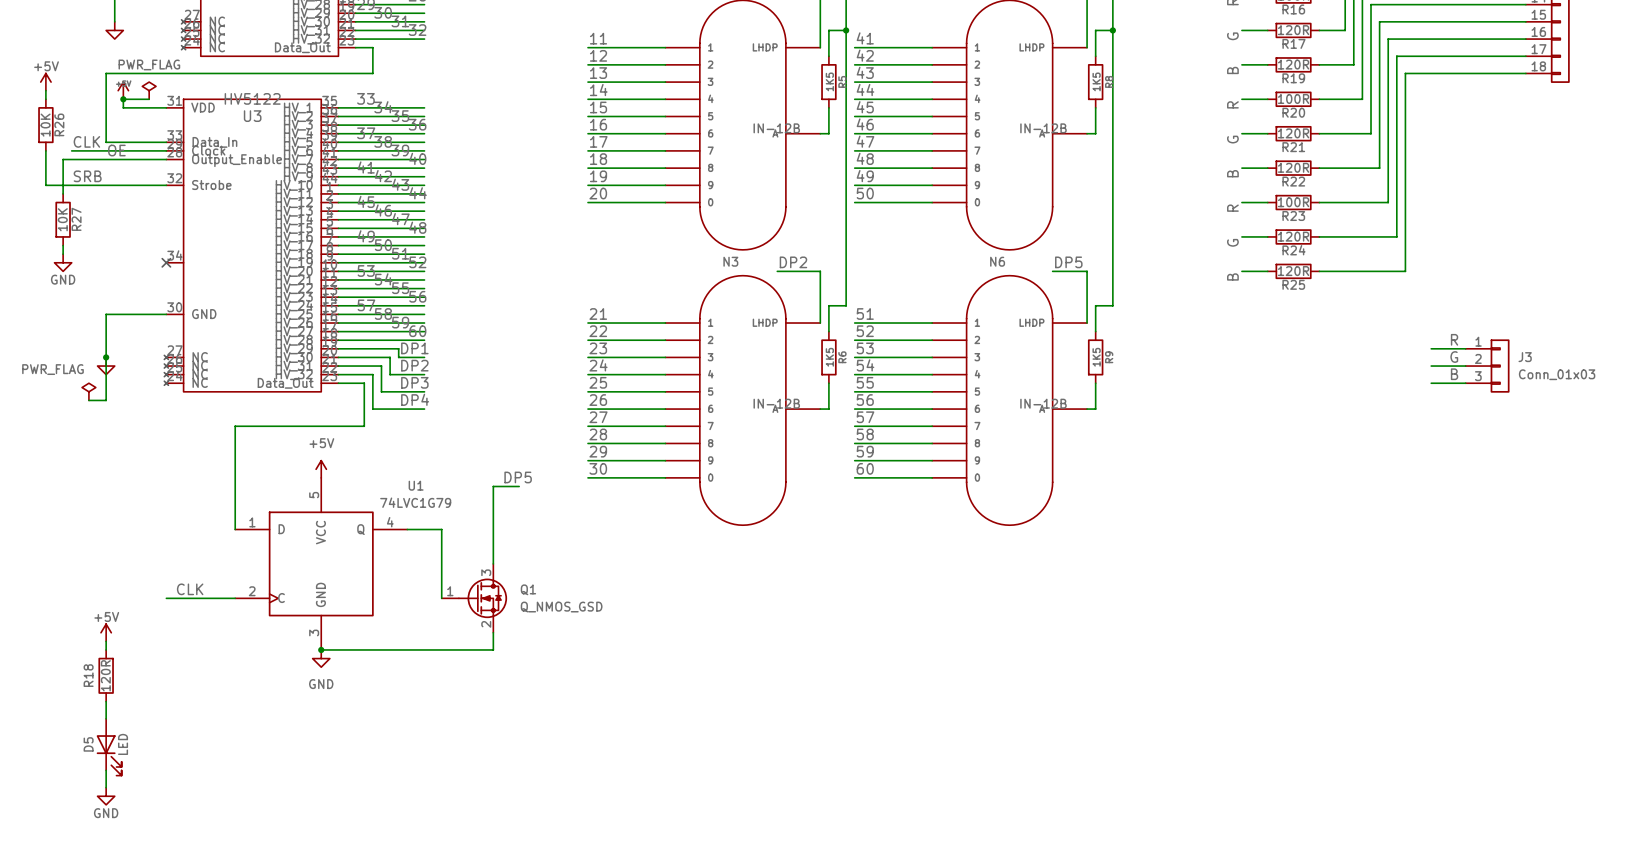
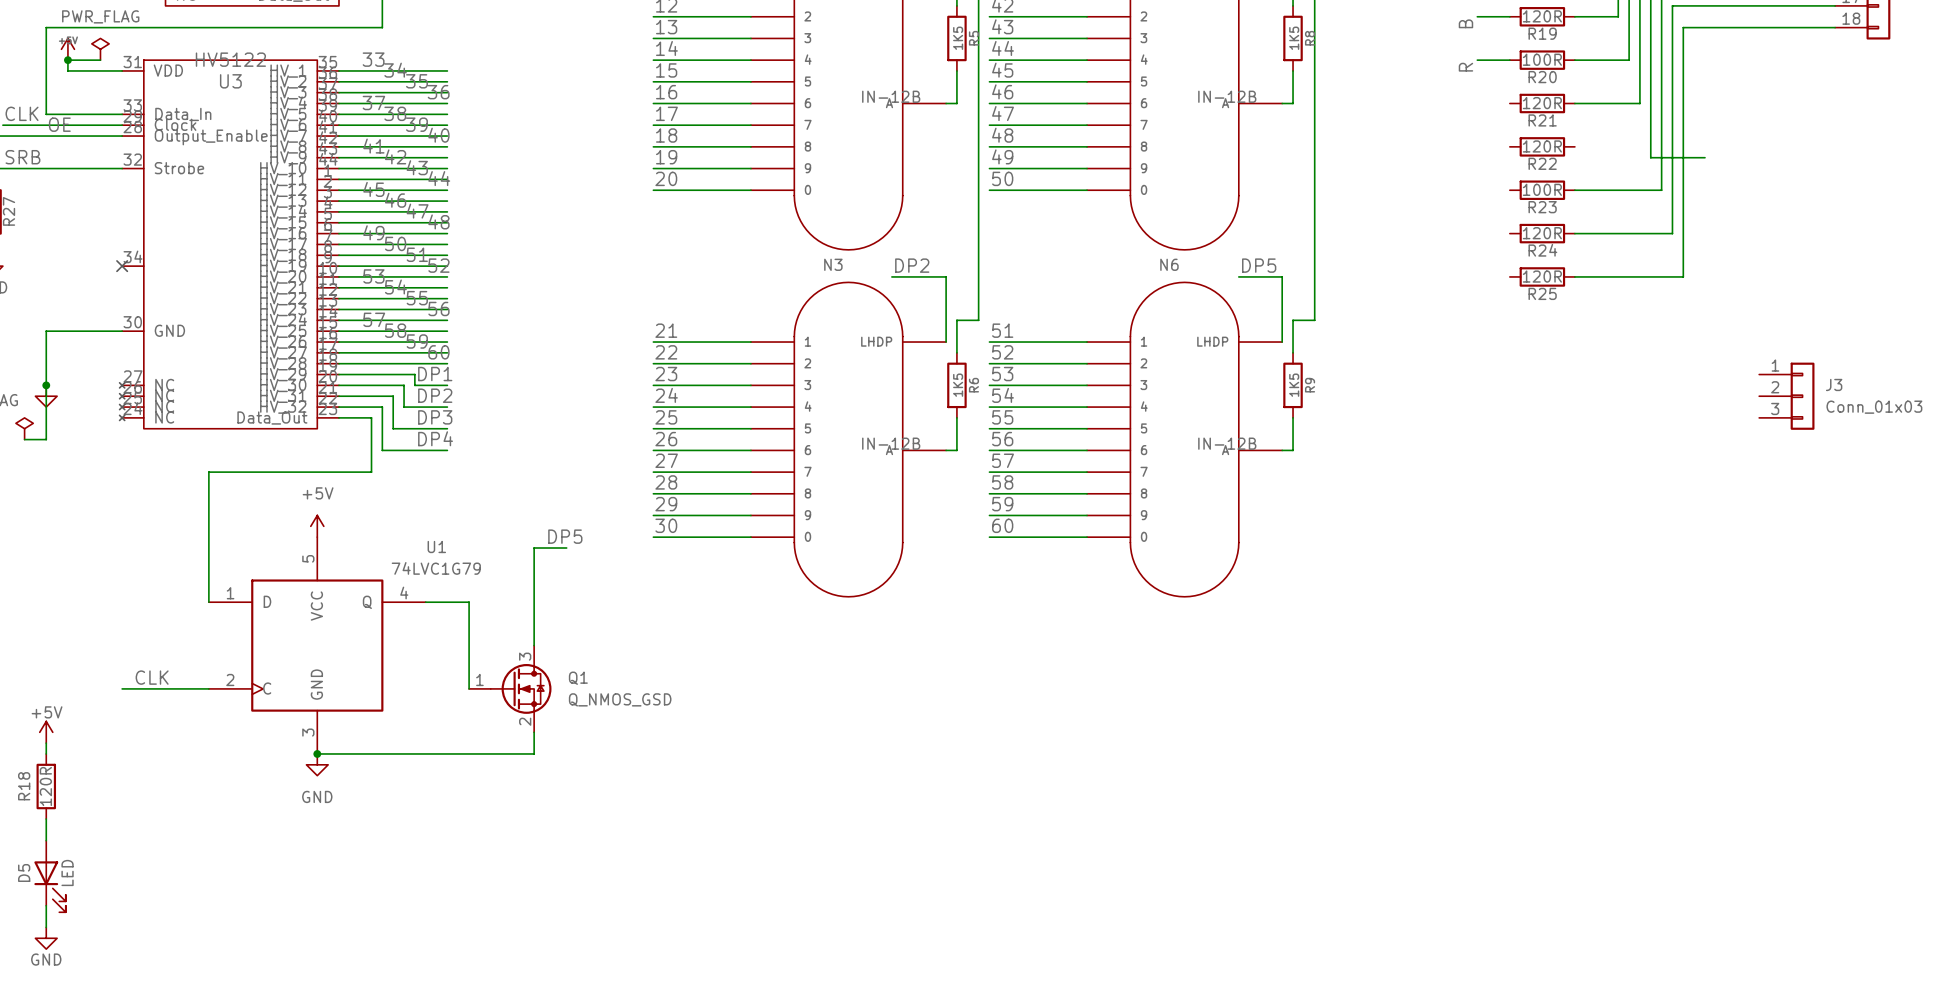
wire: (1241, 133) (1267, 133) -> none
label: G (1232, 139) -> none
wire: (1241, 168) (1267, 168) -> none
wire: (1319, 168) (1379, 168) -> (1704, 157) (1650, 157) (1650, 146)
label: B (1232, 173) -> none
wire: (1241, 202) (1267, 202) -> none
label: R (1232, 208) -> none
wire: (1241, 236) (1267, 236) -> none
label: G (1232, 242) -> none
wire: (1241, 271) (1267, 271) -> none
label: B (1232, 276) -> none
label: R (1454, 339) -> none
wire: (1431, 348) (1465, 348) -> none
label: G (1454, 357) -> none
wire: (1431, 366) (1465, 366) -> none
label: B (1454, 374) -> none
wire: (1431, 383) (1465, 383) -> none

